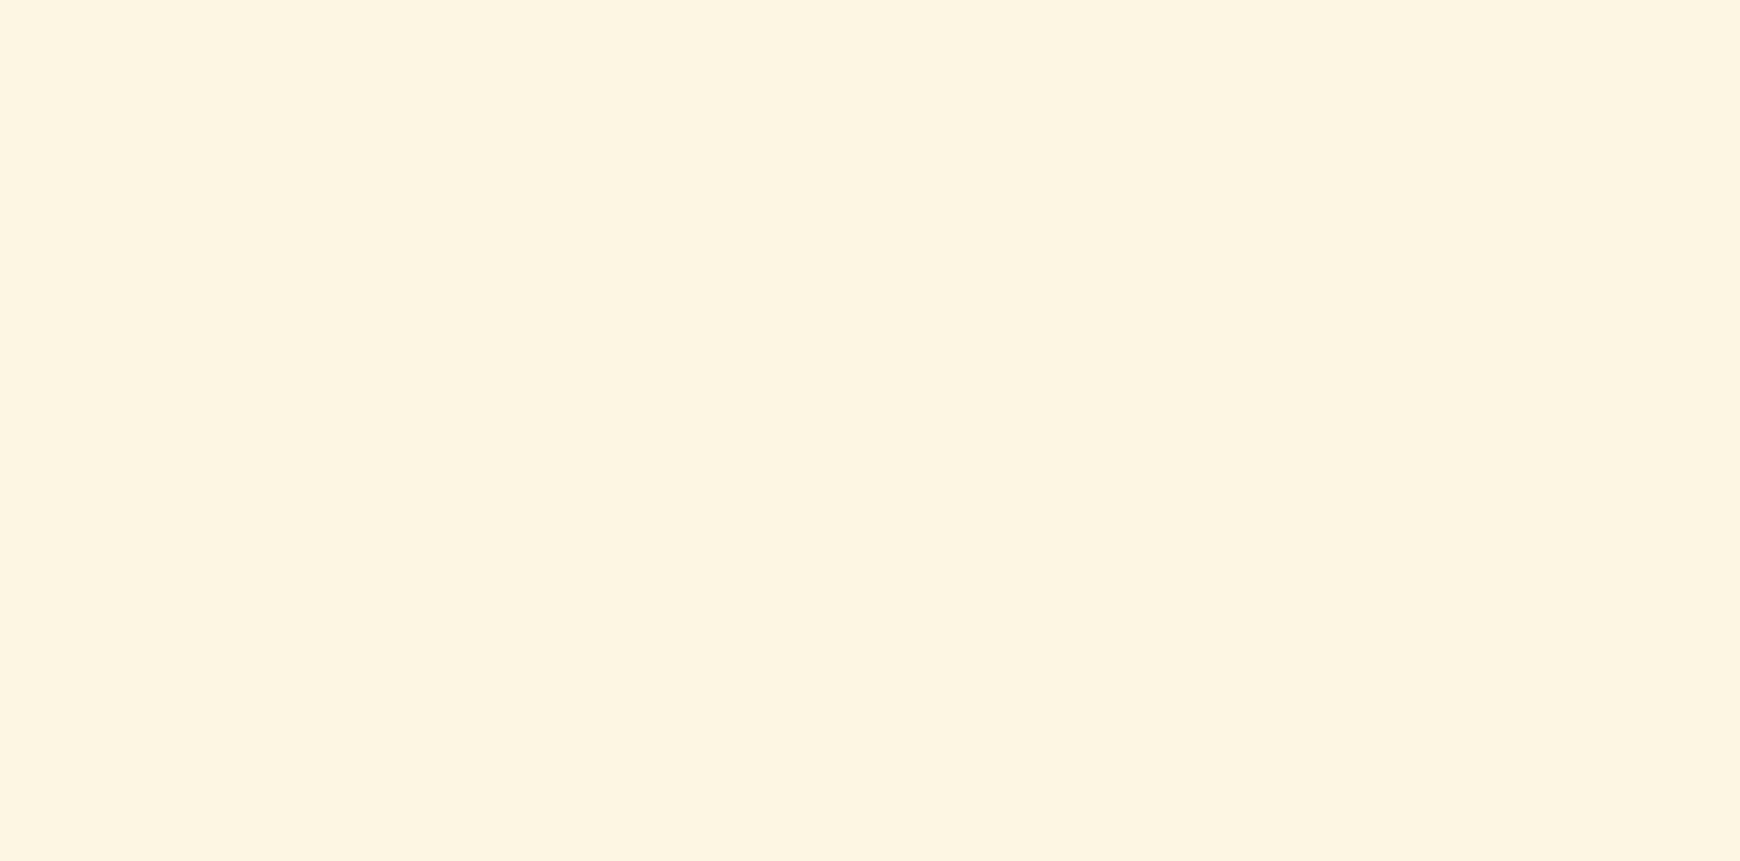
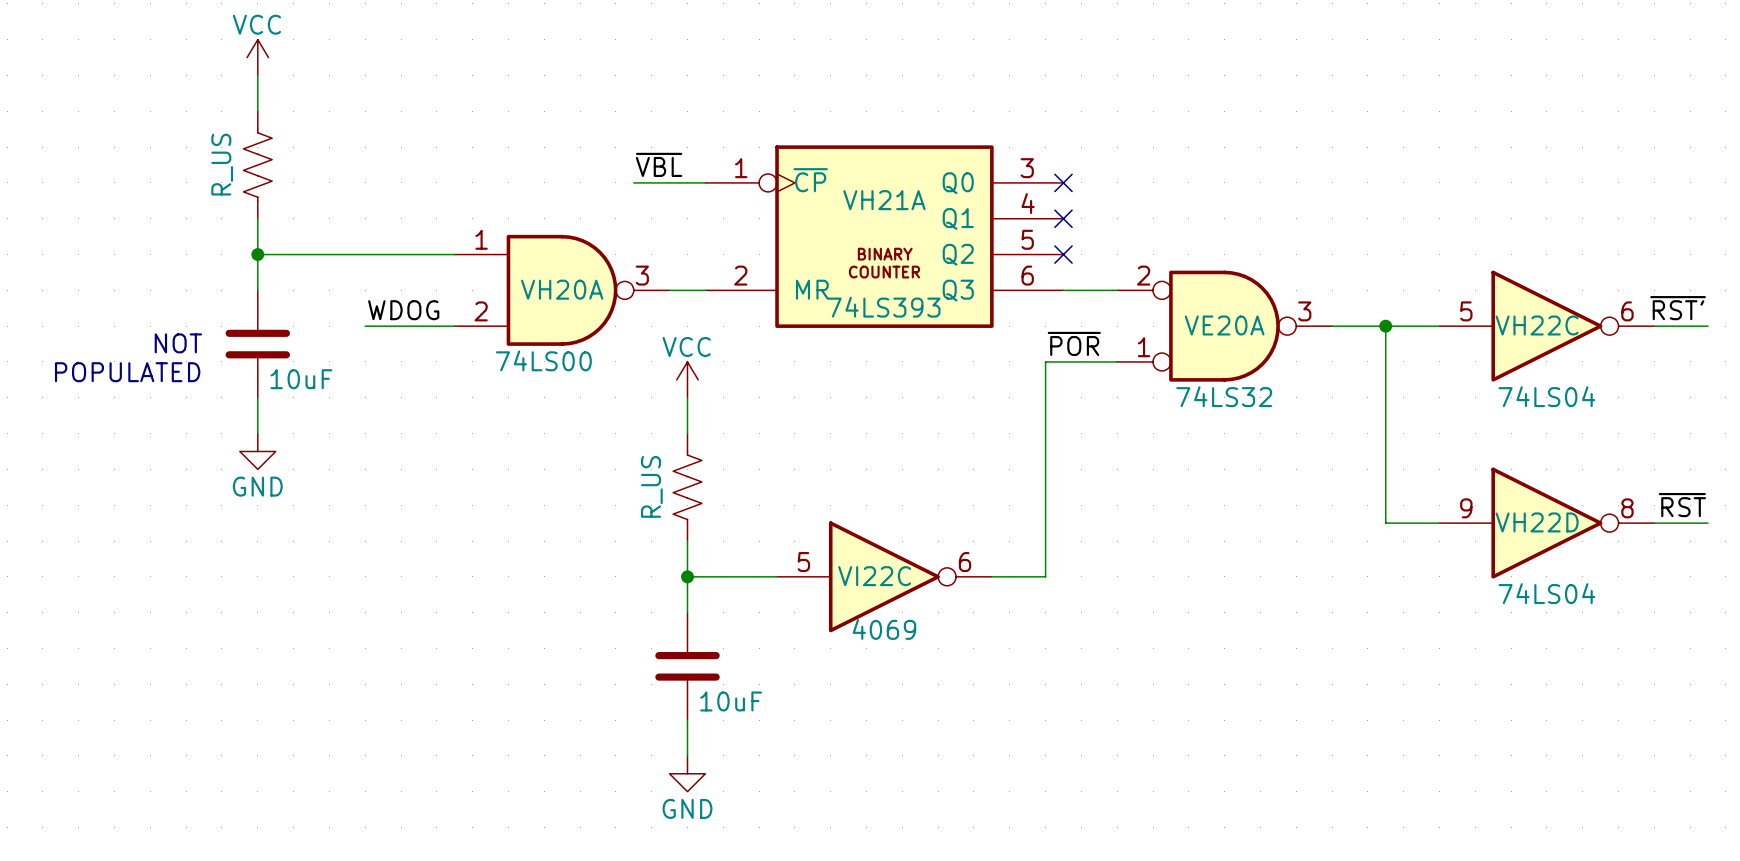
power symbol: none -> VCC (257, 57)
wire: none -> (257, 75) (257, 111)
label: none -> ~{VBL} (659, 164)
part: none -> R_US (257, 165)
wire: none -> (633, 182) (705, 182)
no-connect mark: none -> (1063, 182)
wire: none -> (257, 218) (257, 290)
no-connect mark: none -> (1063, 218)
VH21A: none -> 74LS393 (884, 236)
wire: none -> (257, 254) (454, 254)
junction: none -> (257, 254)
no-connect mark: none -> (1063, 254)
VH20A: none -> 74LS00 (562, 290)
wire: none -> (669, 290) (705, 290)
wire: none -> (1063, 290) (1117, 290)
label: none -> ~{RST'} (1678, 308)
label: none -> WDOG (403, 310)
wire: none -> (365, 326) (454, 326)
VE20A: none -> 74LS32 (1224, 326)
wire: none -> (1332, 326) (1439, 326)
wire: none -> (1385, 326) (1385, 523) (1439, 523)
junction: none -> (1385, 326)
VH22C: none -> 74LS04 (1546, 326)
wire: none -> (1654, 326) (1708, 326)
text: none -> NOT (178, 343)
label: none -> ~{POR} (1074, 343)
part: none -> 10uF (257, 344)
wire: none -> (1117, 361) (1045, 361) (1045, 576) (991, 576)
text: none -> POPULATED (127, 372)
power symbol: none -> VCC (687, 379)
wire: none -> (257, 397) (257, 433)
wire: none -> (687, 397) (687, 433)
power symbol: none -> GND (257, 451)
part: none -> R_US (687, 487)
label: none -> ~{RST} (1682, 505)
VH22D: none -> 74LS04 (1546, 523)
wire: none -> (1654, 523) (1708, 523)
wire: none -> (687, 541) (687, 612)
wire: none -> (687, 576) (777, 576)
junction: none -> (687, 576)
VI22C: none -> 4069 (884, 576)
part: none -> 10uF (687, 666)
wire: none -> (687, 720) (687, 755)
power symbol: none -> GND (687, 773)

